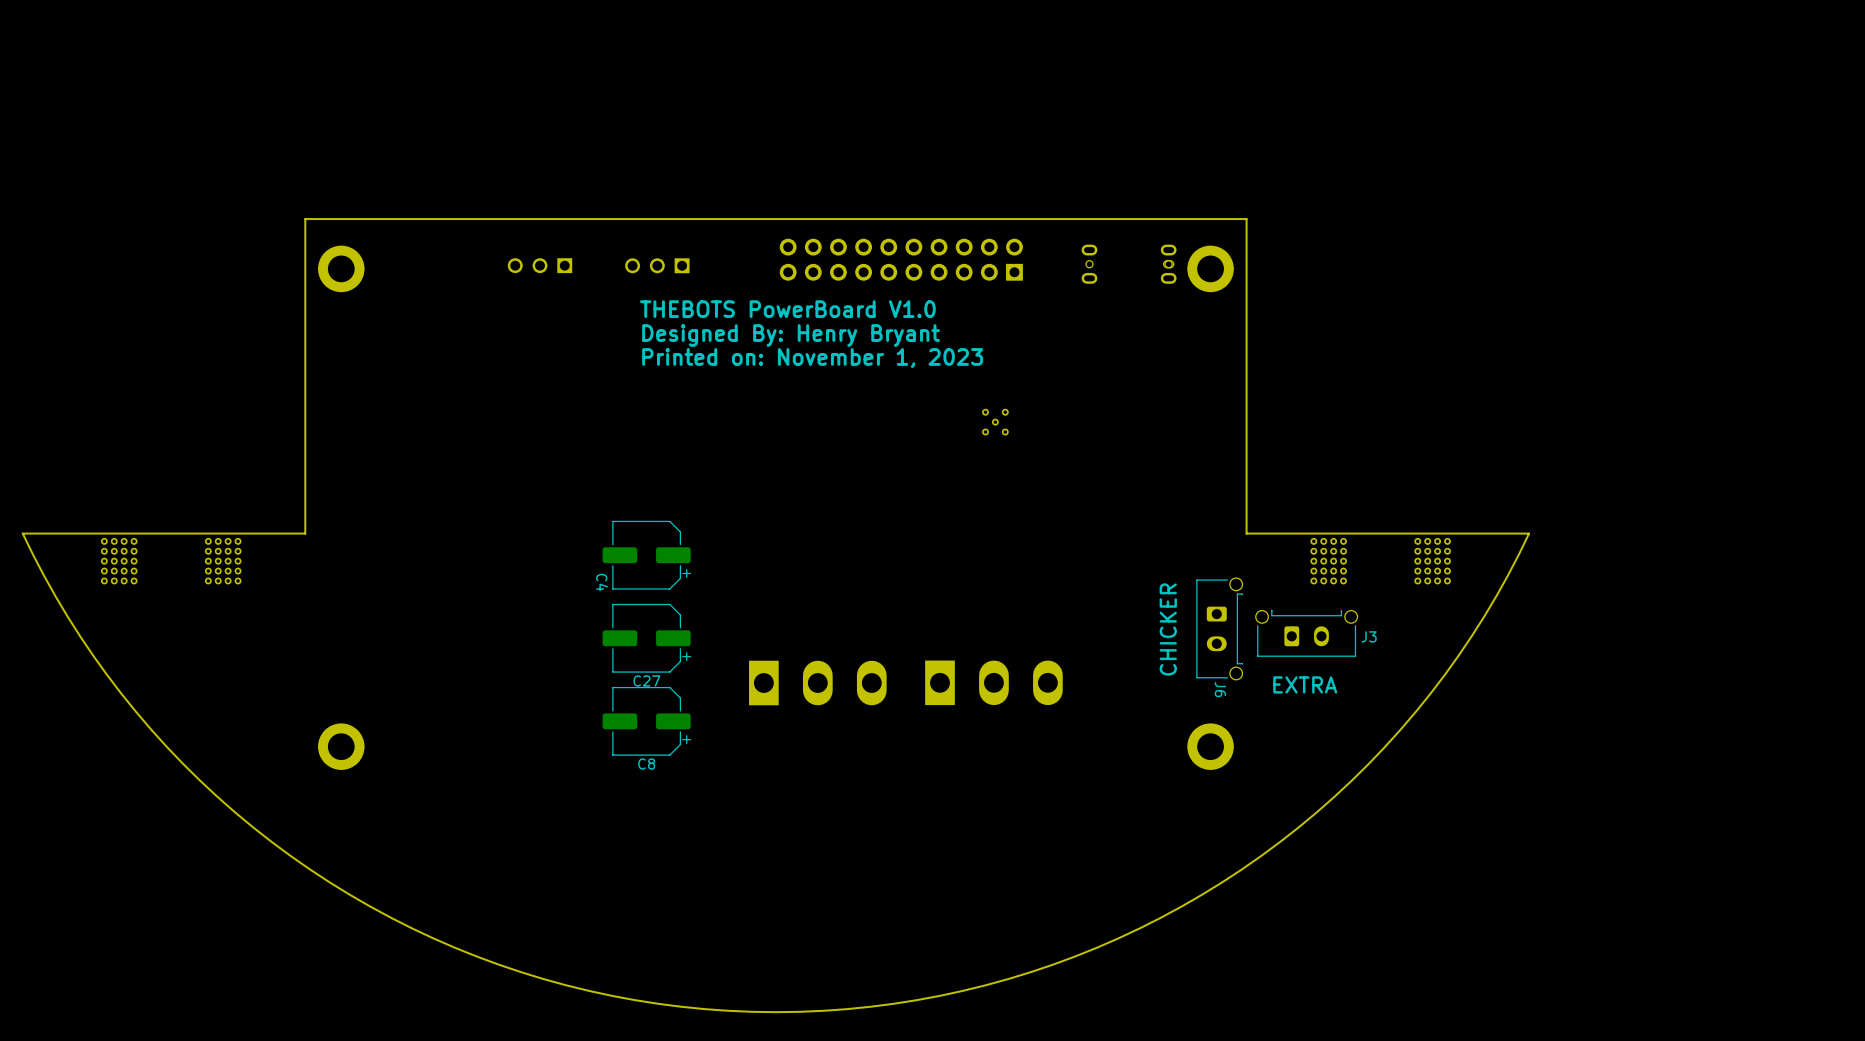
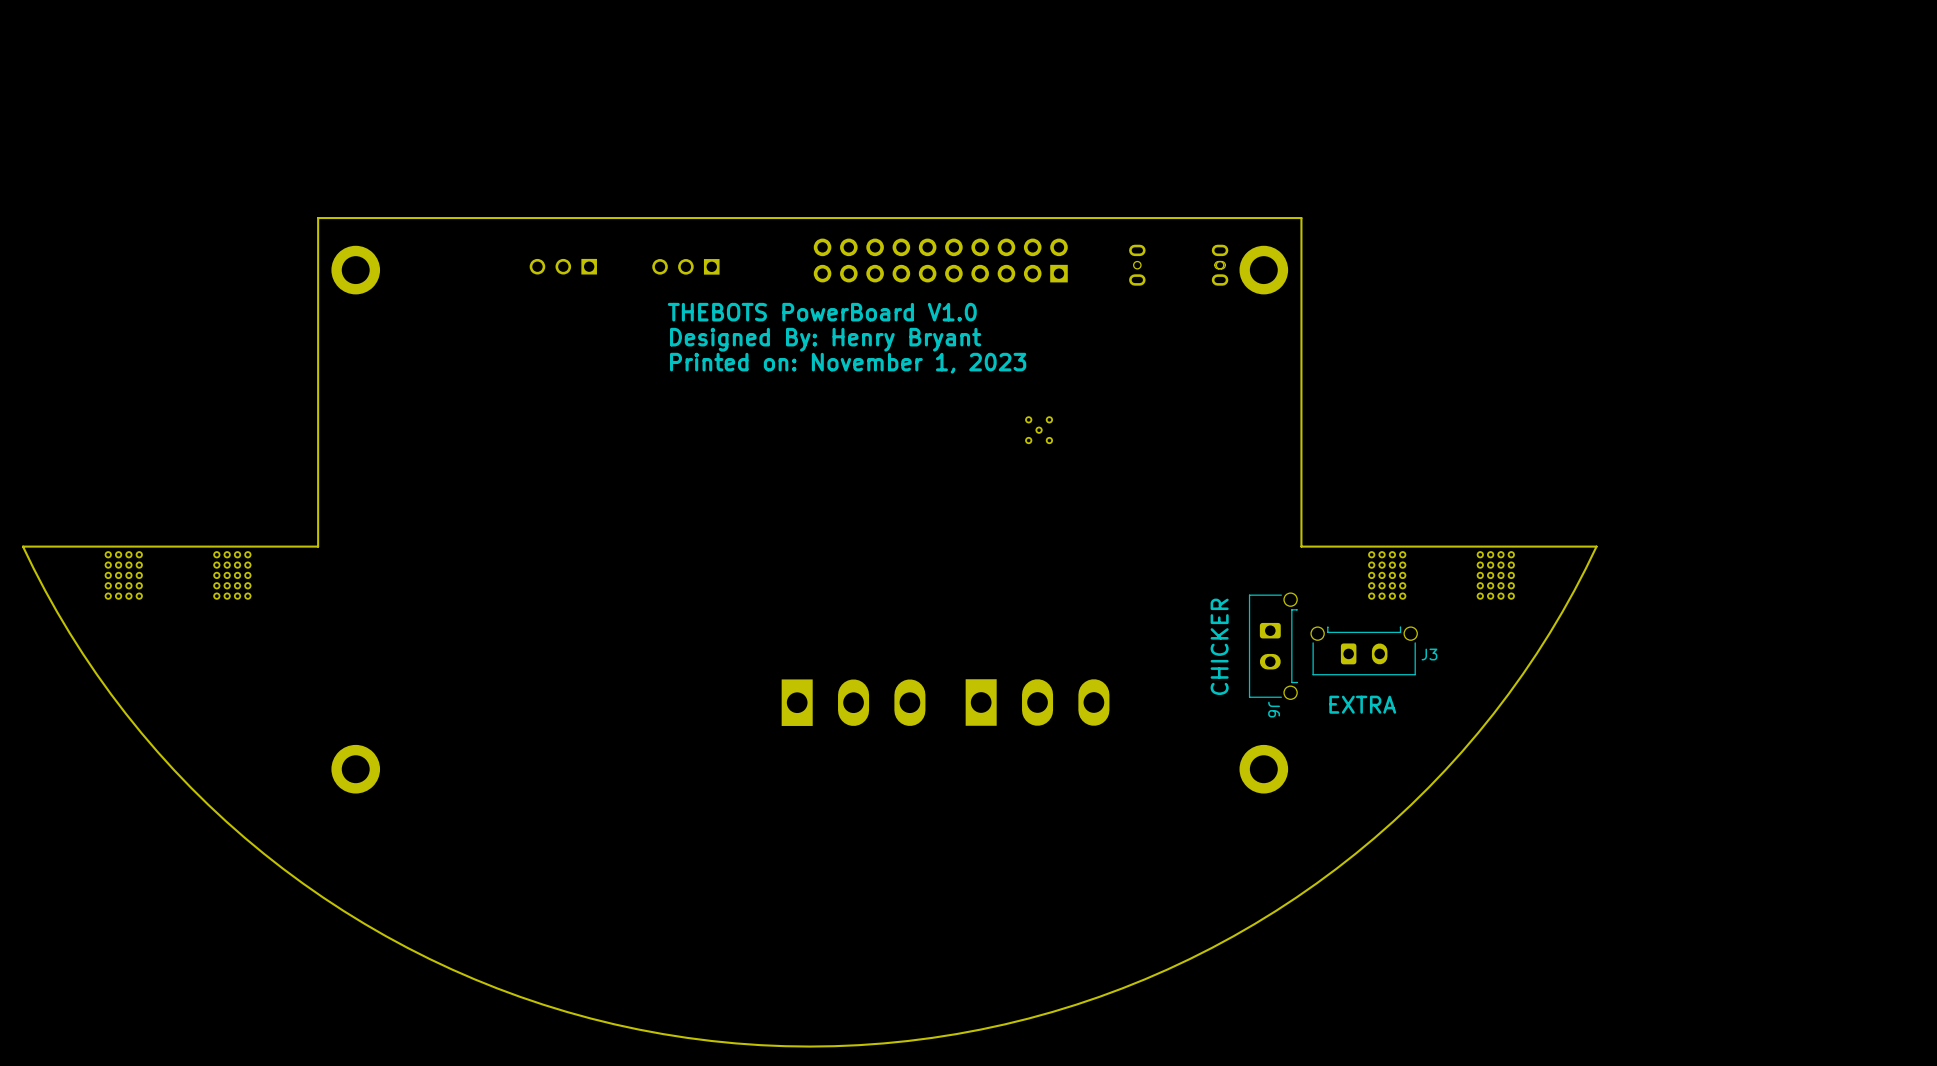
C4: (646, 555) -> none
C27: (646, 638) -> none
C8: (646, 721) -> none

